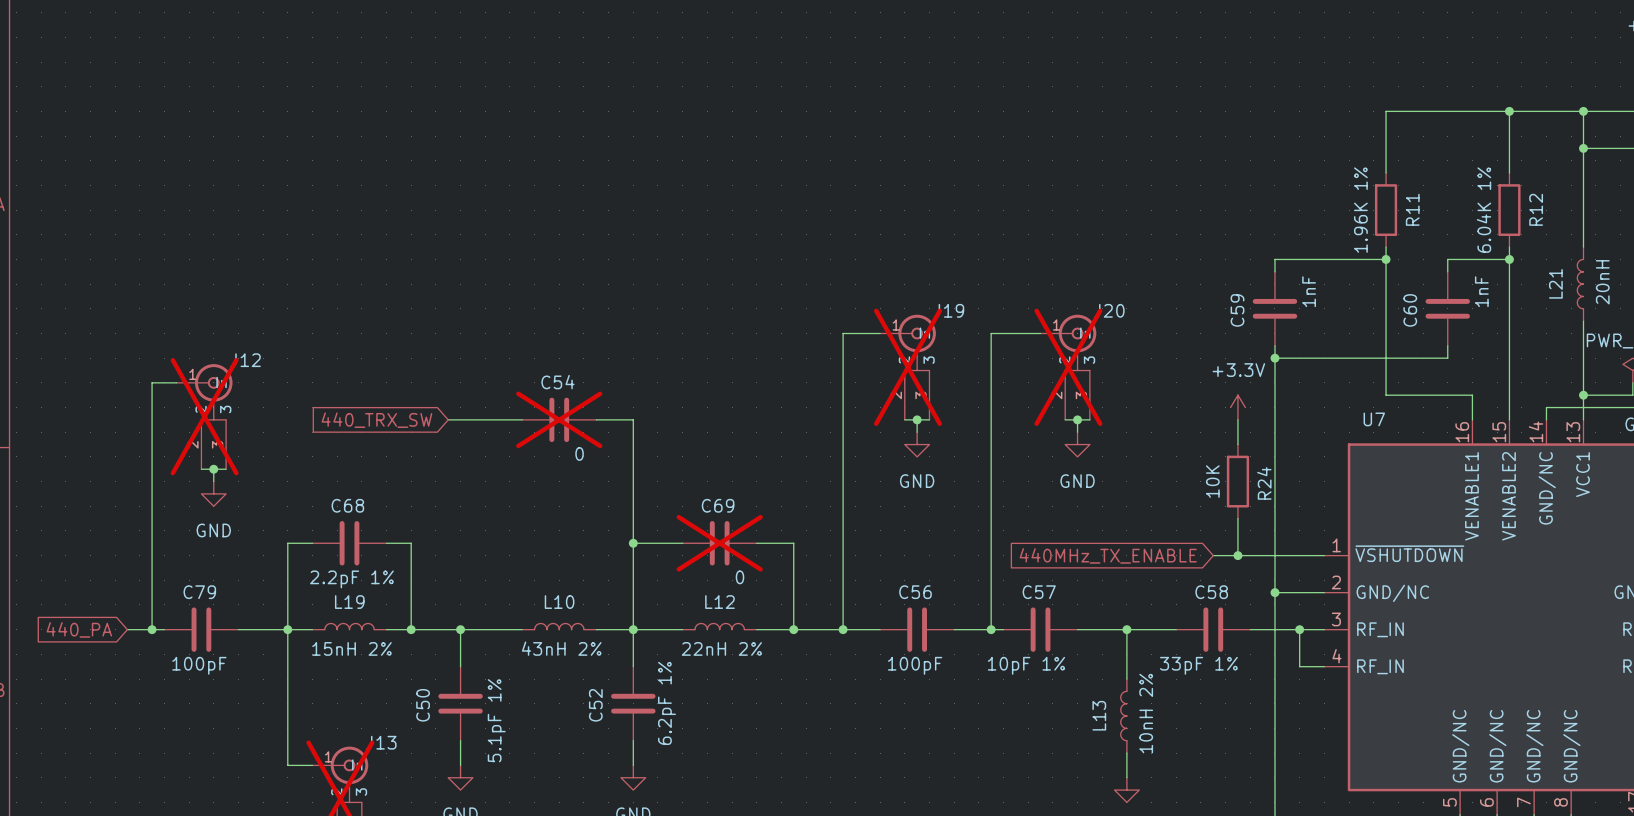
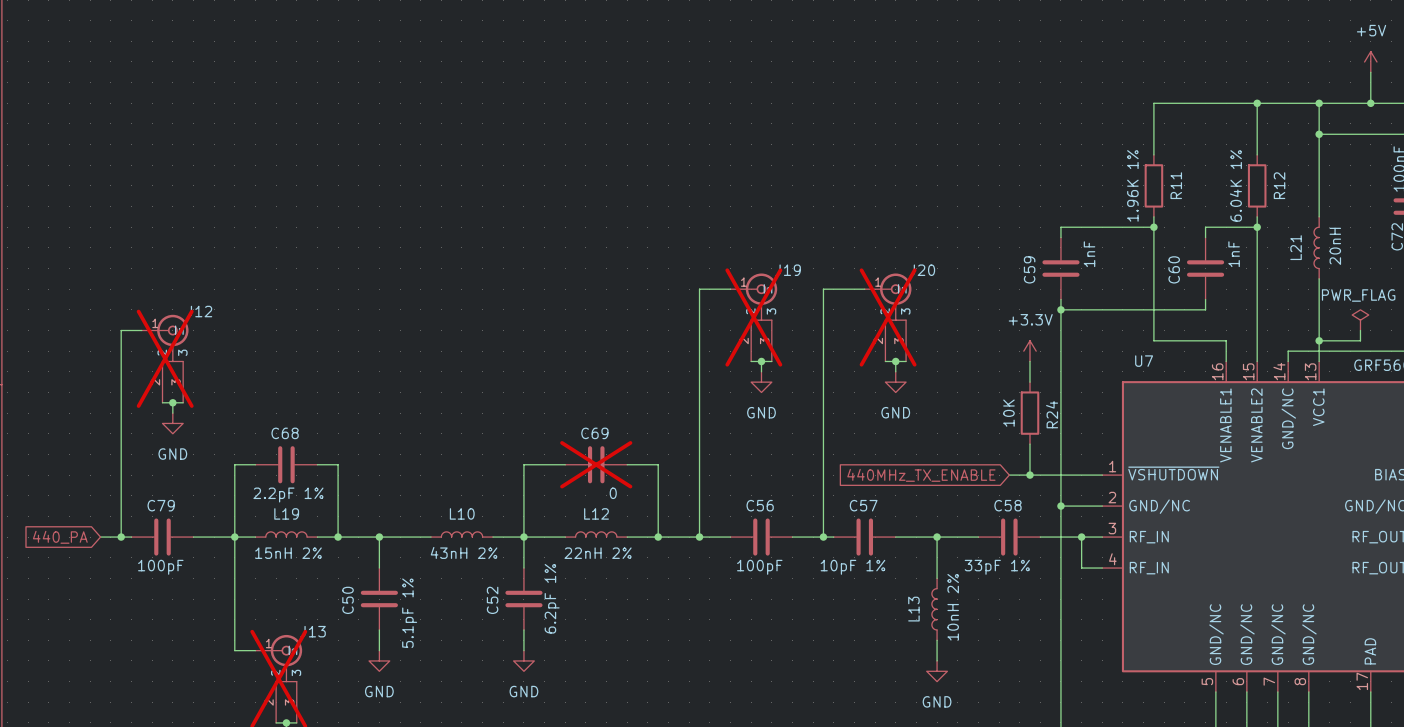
wire: (448, 419) (522, 419) -> none
C54: 0 (559, 419) -> none
wire: (596, 419) (633, 419) (633, 543) -> none
global label: 440_TRX_SW (376, 420) -> none
junction: (633, 543) -> none

